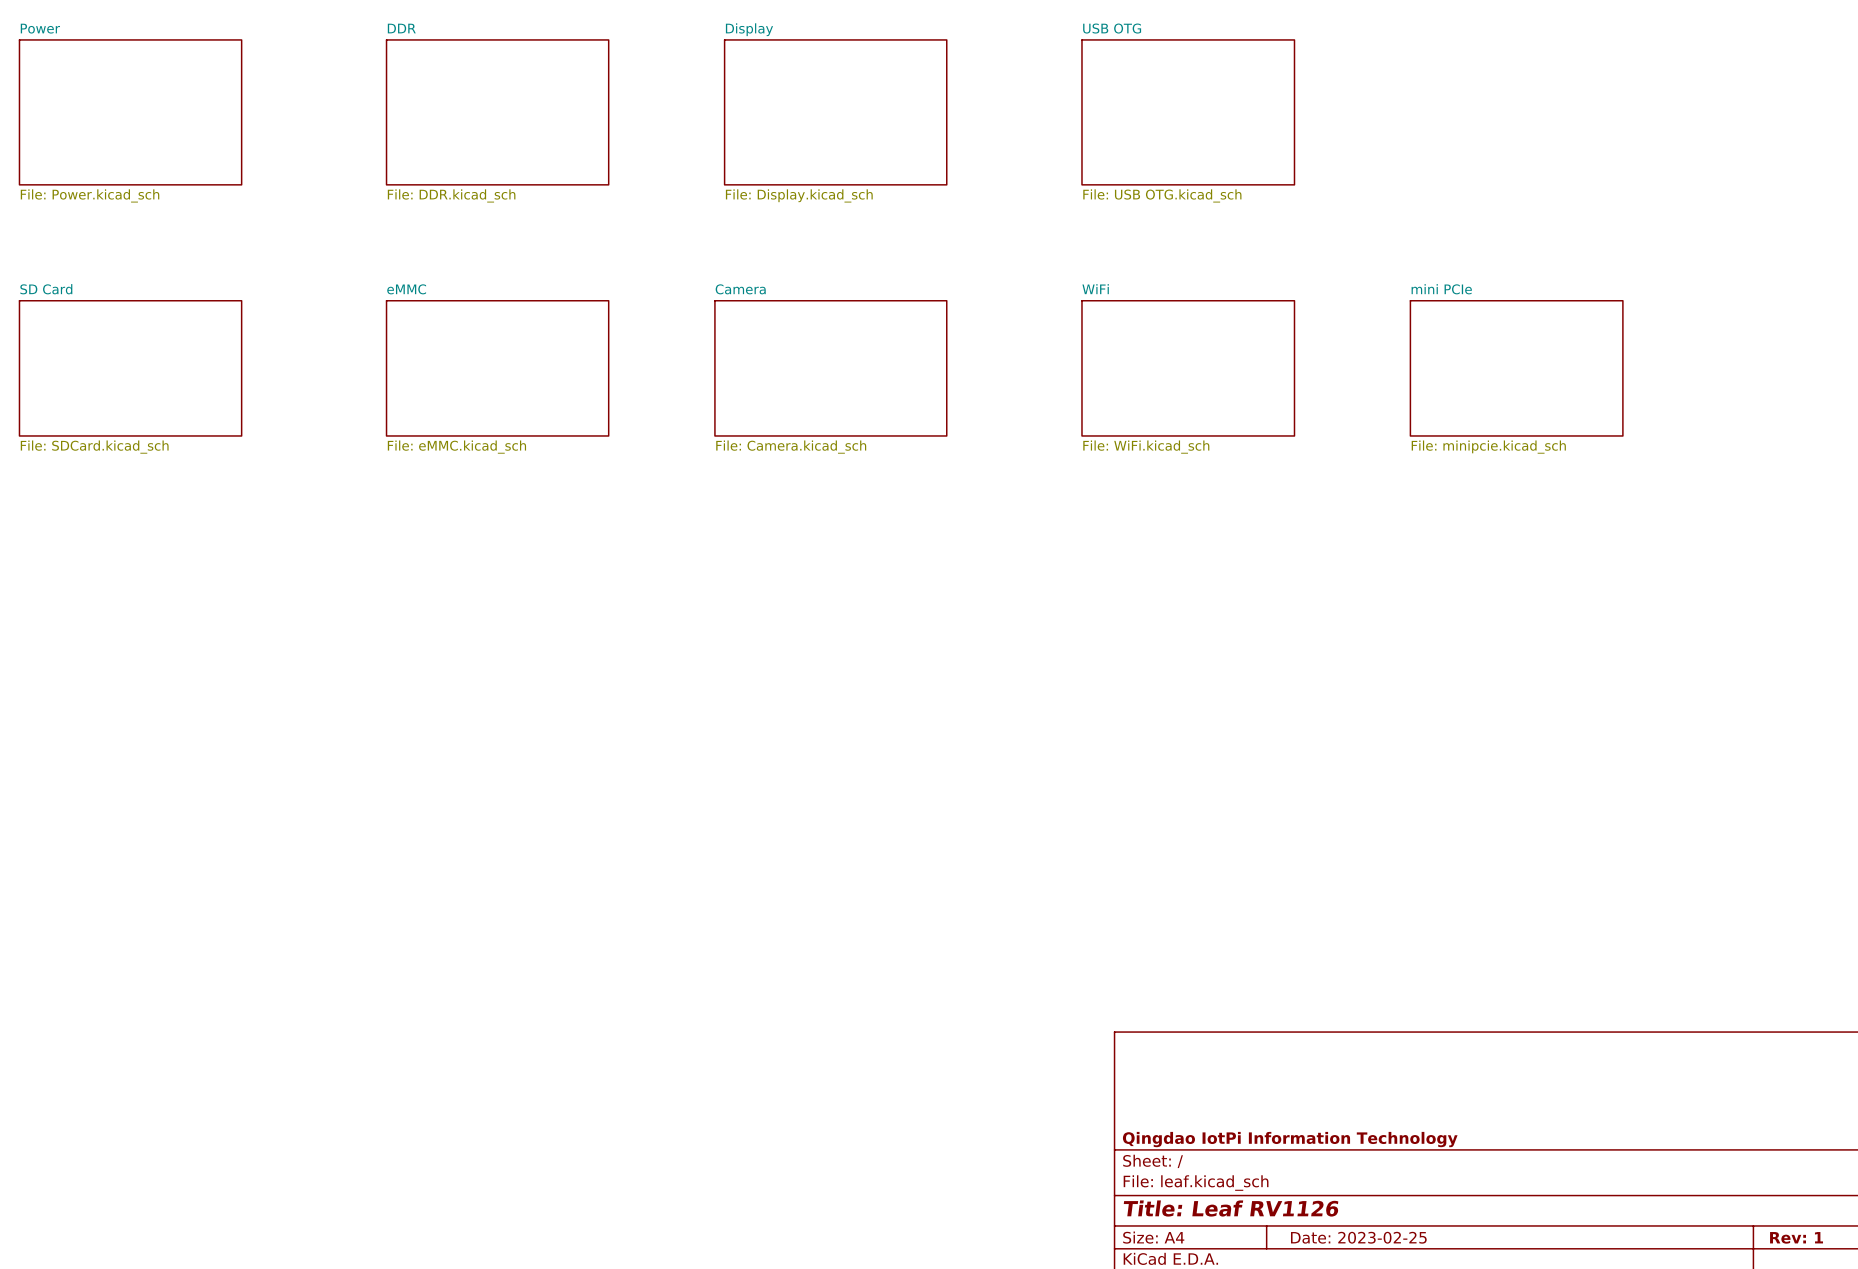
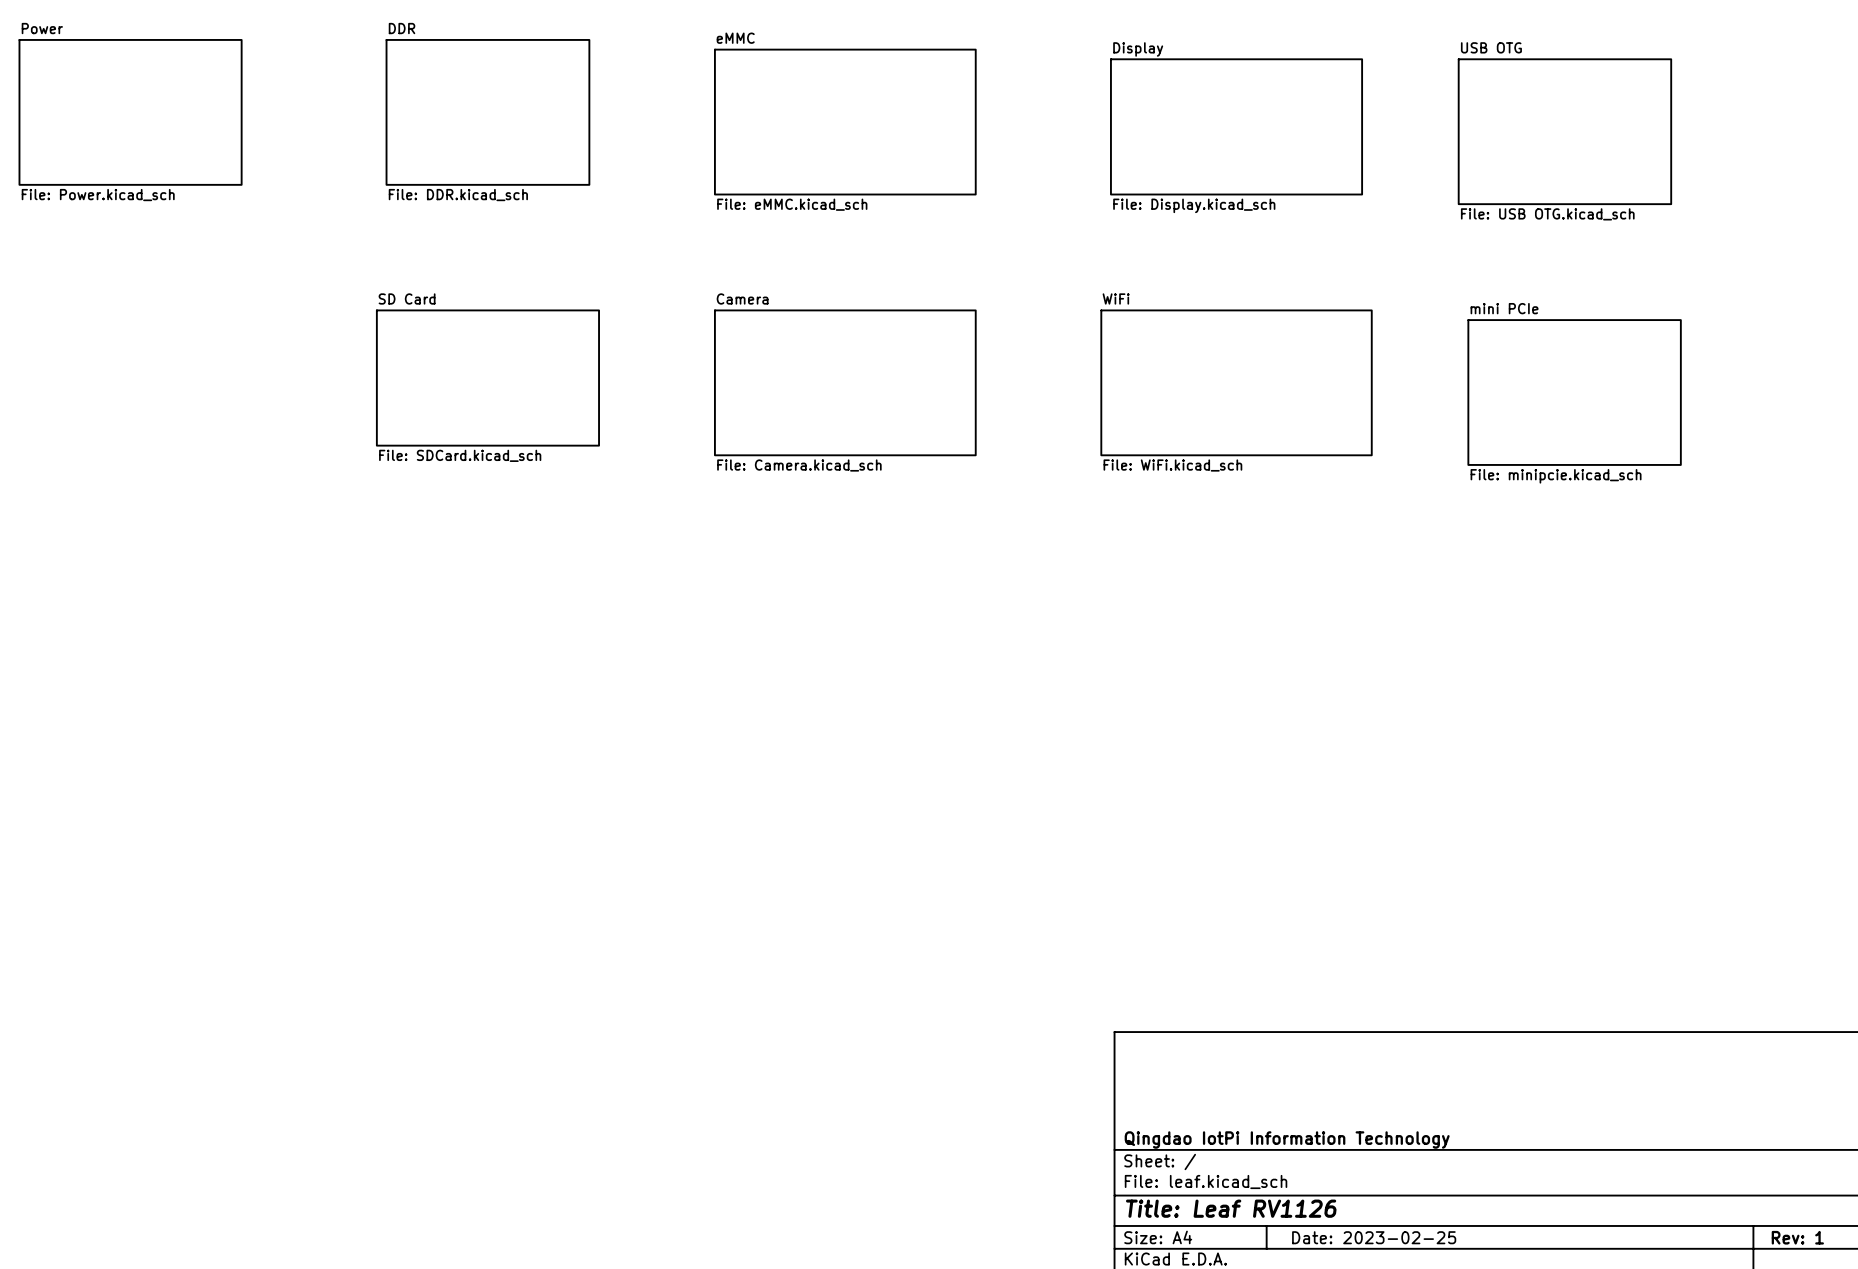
sheet DDR: none -> File: DDR.kicad_sch (487, 112)
sheet DDR: File: DDR.kicad_sch (497, 112) -> none
sheet Display: File: Display.kicad_sch (835, 112) -> none
sheet USB OTG: File: USB OTG.kicad_sch (1188, 112) -> none
sheet eMMC: none -> File: eMMC.kicad_sch (845, 122)
sheet Display: none -> File: Display.kicad_sch (1236, 126)
sheet USB OTG: none -> File: USB OTG.kicad_sch (1564, 131)
sheet SD Card: File: SDCard.kicad_sch (130, 368) -> none
sheet eMMC: File: eMMC.kicad_sch (497, 368) -> none
sheet Camera: File: Camera.kicad_sch (830, 368) -> none
sheet WiFi: File: WiFi.kicad_sch (1188, 368) -> none
sheet mini PCIe: File: minipcie.kicad_sch (1516, 368) -> none
sheet SD Card: none -> File: SDCard.kicad_sch (487, 378)
sheet Camera: none -> File: Camera.kicad_sch (845, 382)
sheet WiFi: none -> File: WiFi.kicad_sch (1236, 382)
sheet mini PCIe: none -> File: minipcie.kicad_sch (1574, 392)

